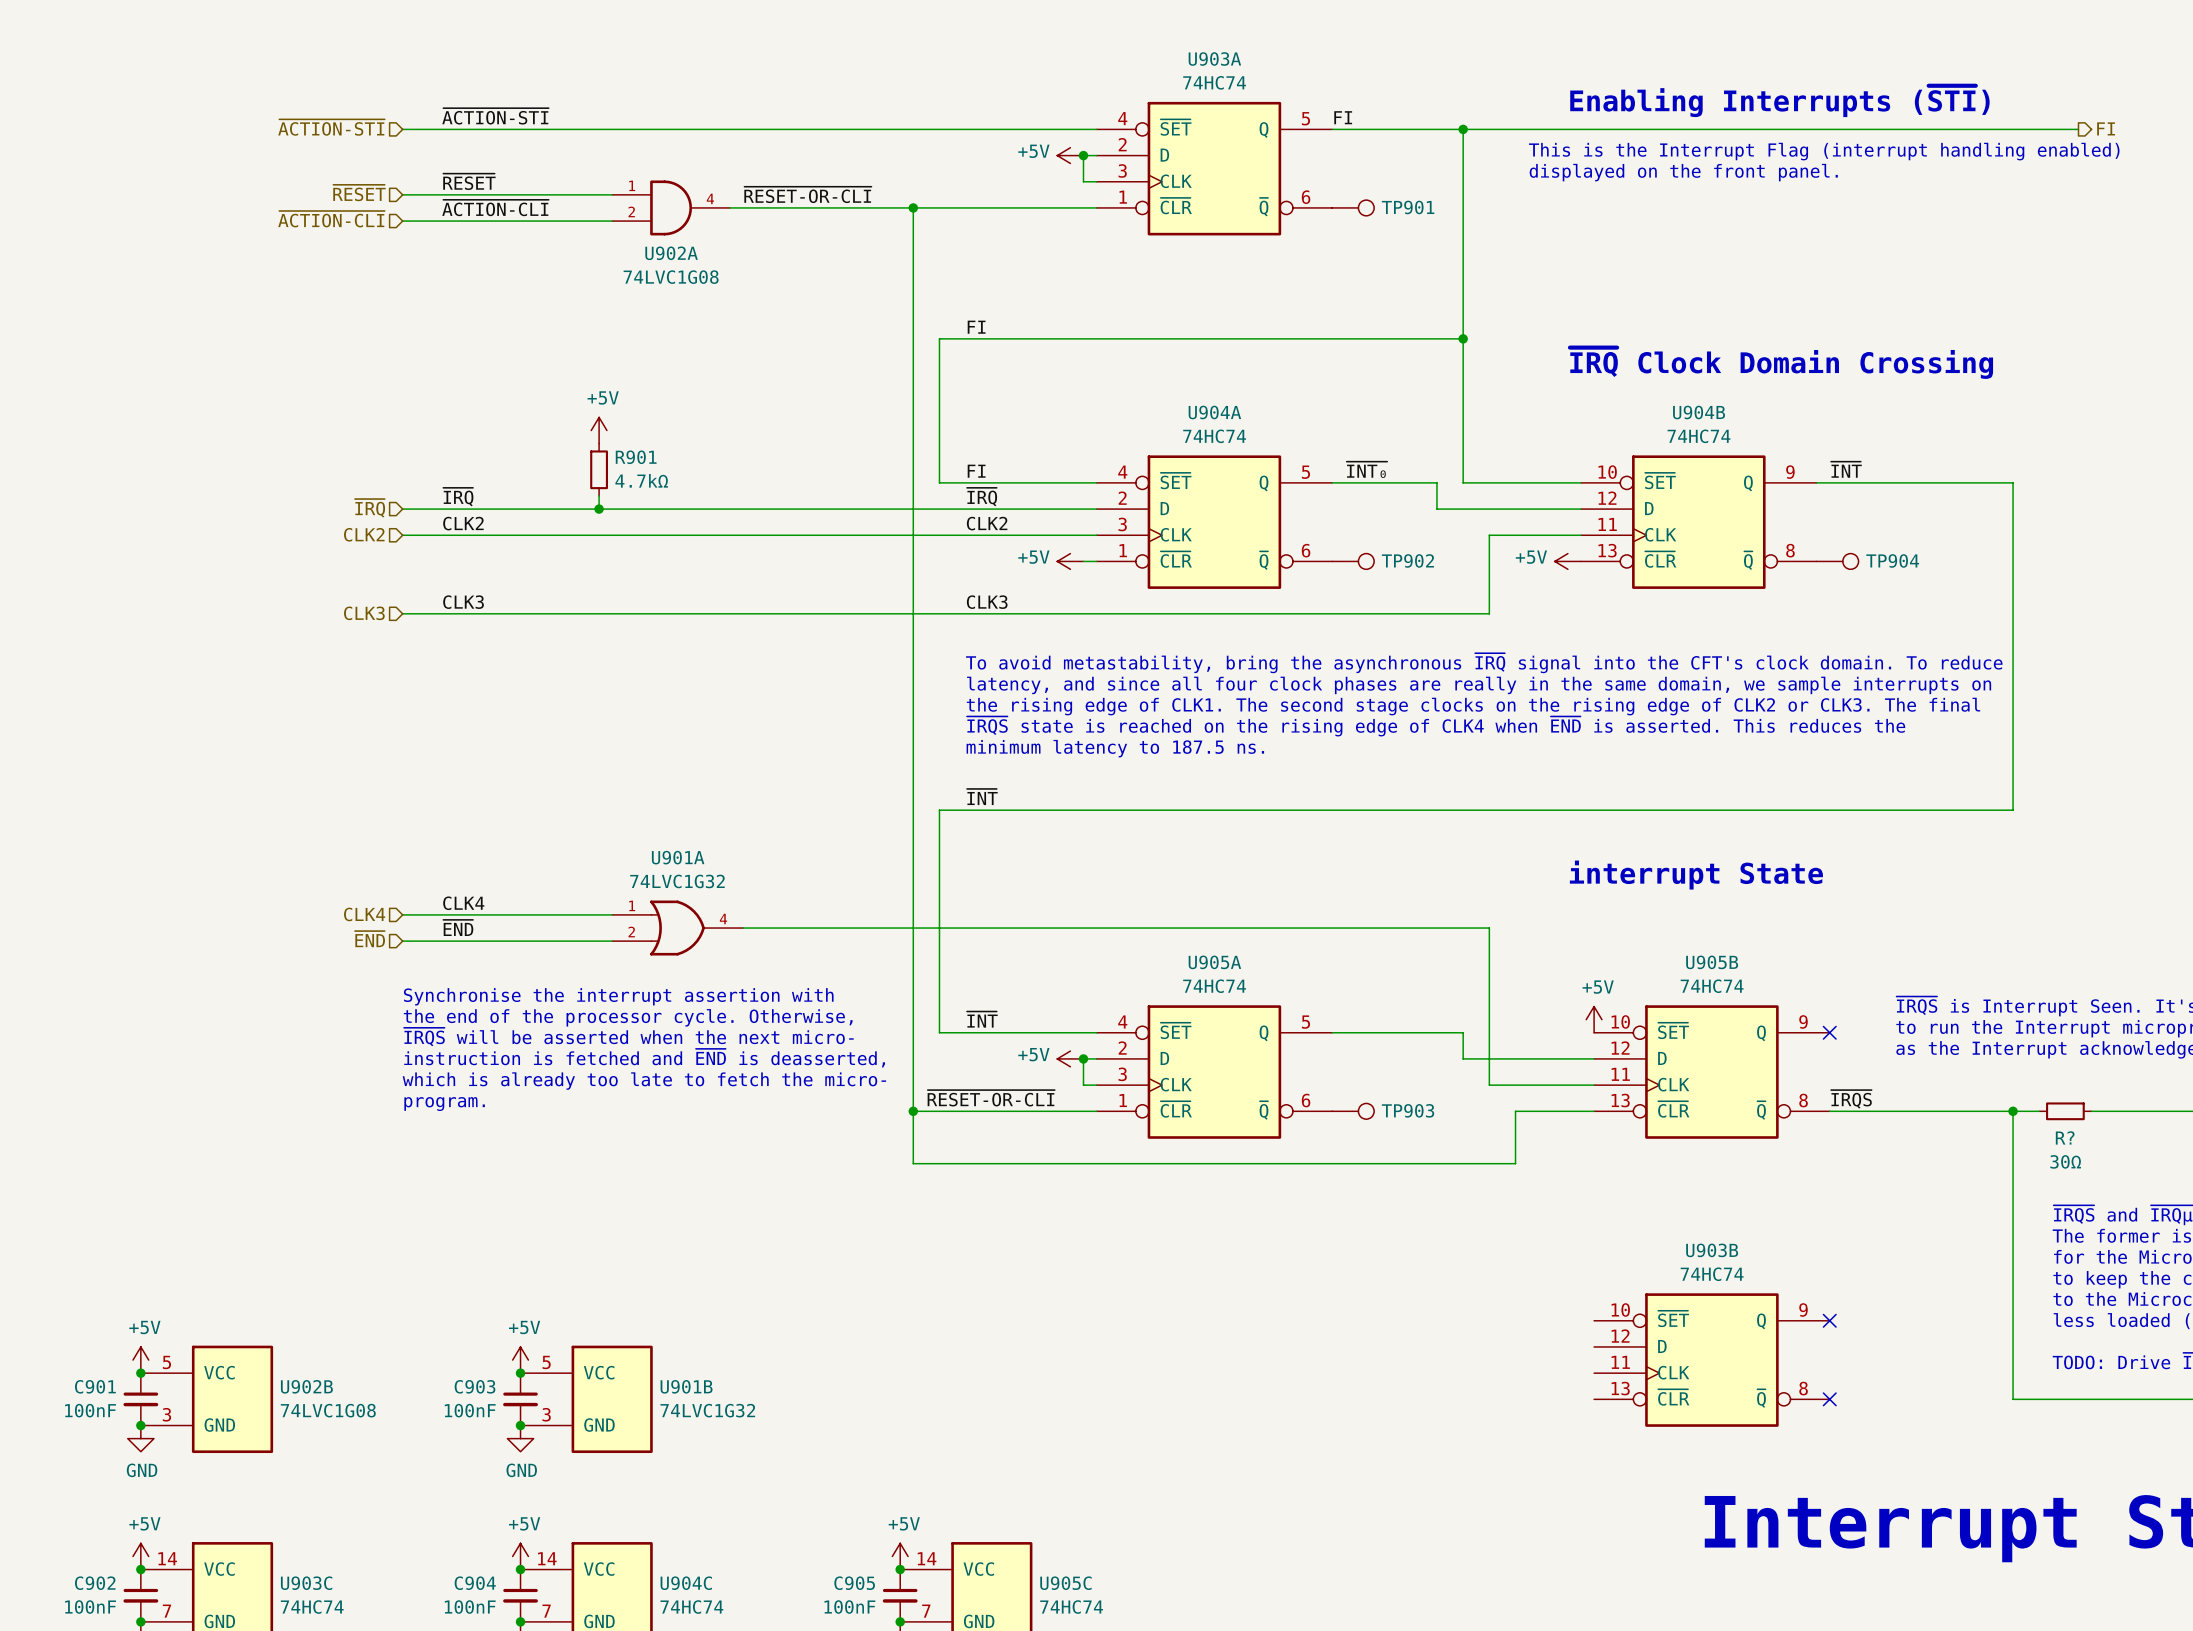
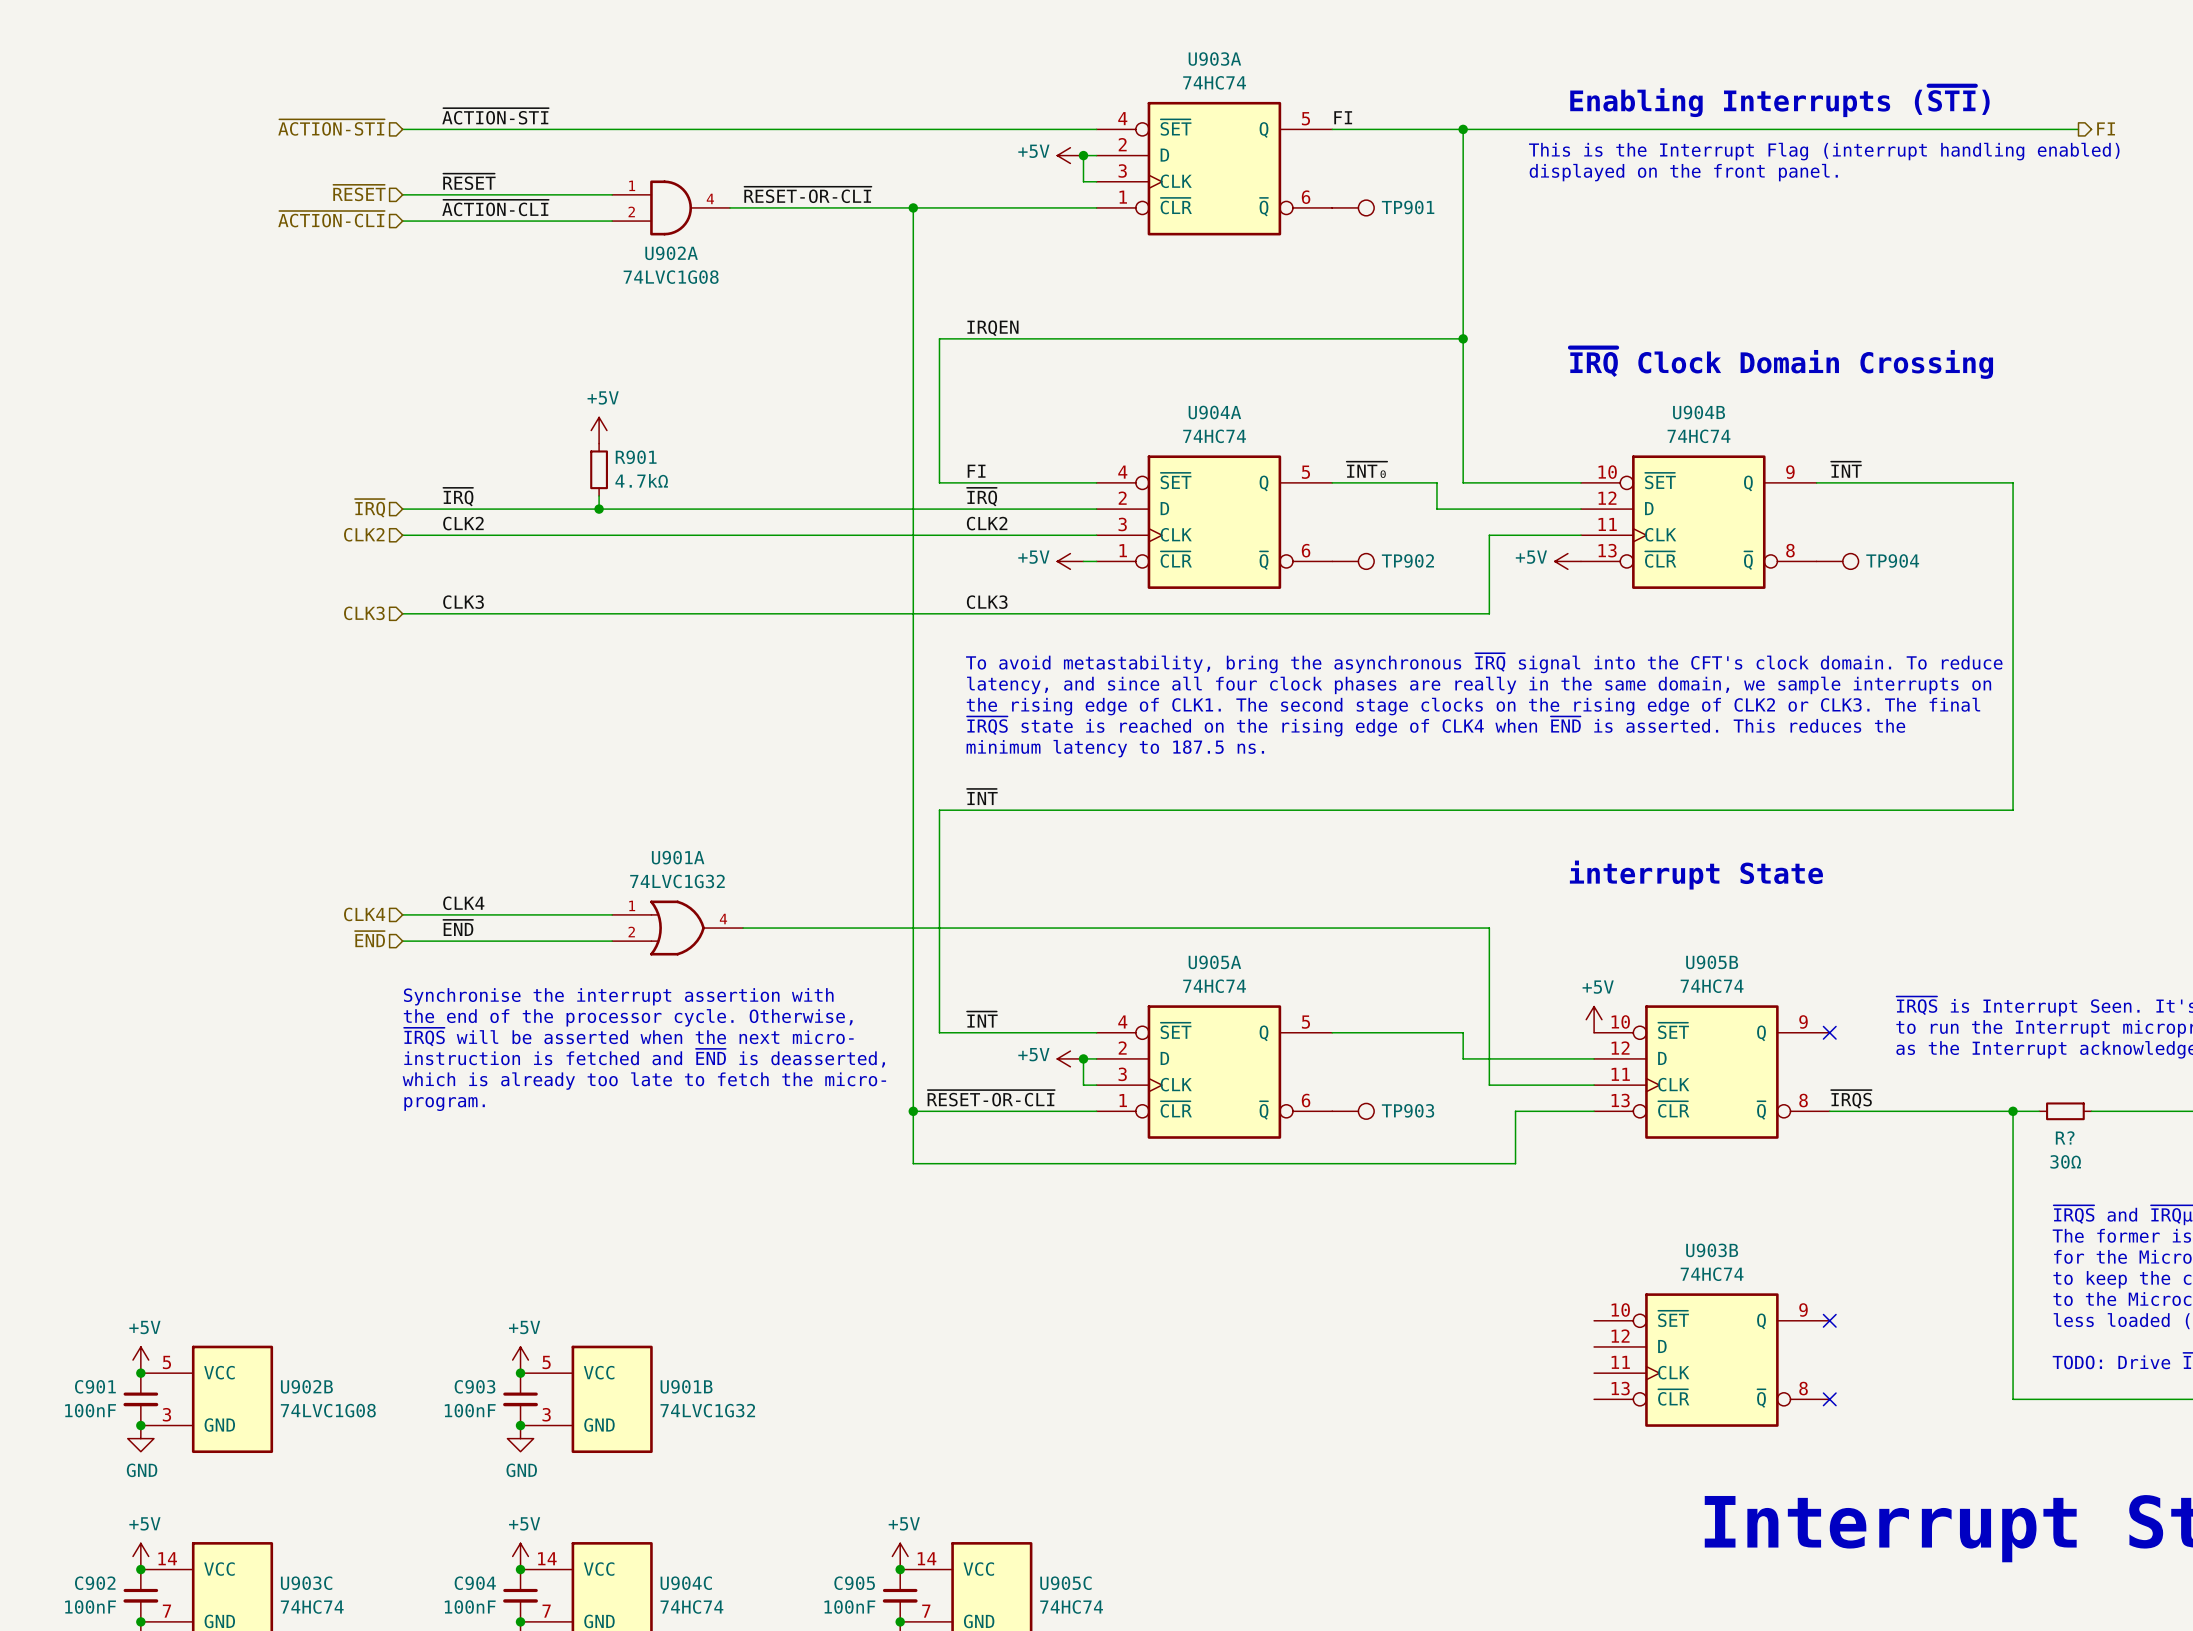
label: FI (976, 327) -> IRQEN (992, 328)

